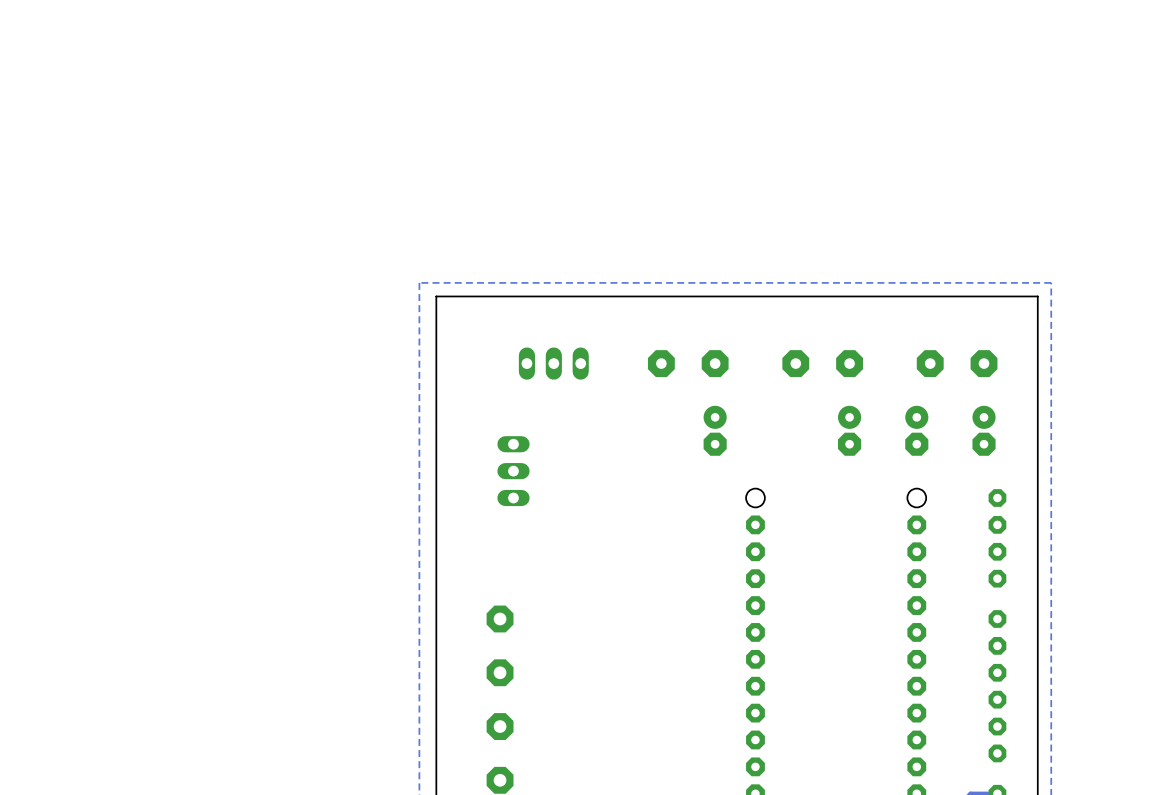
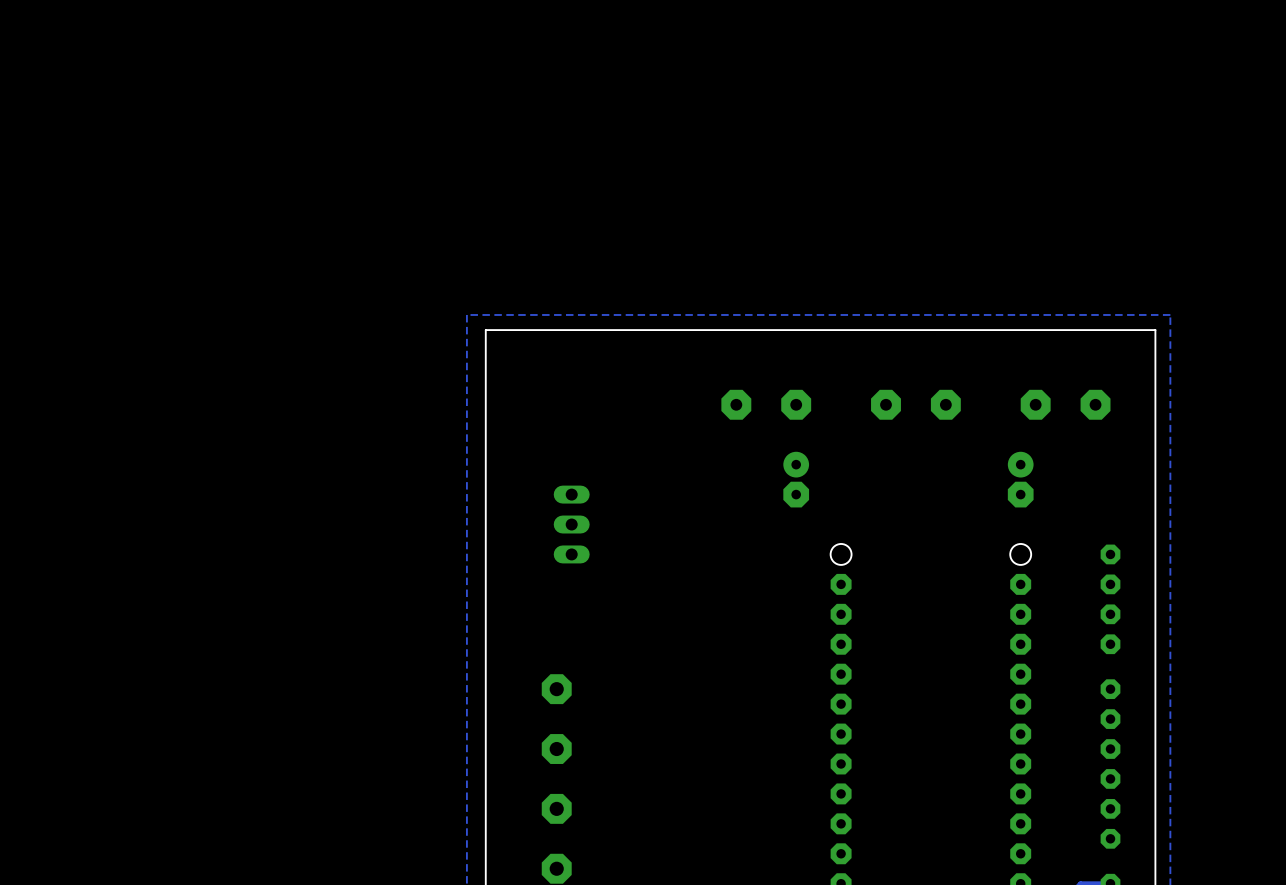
part: (553, 363) -> none
part: (849, 430) -> none
part: (984, 430) -> none

